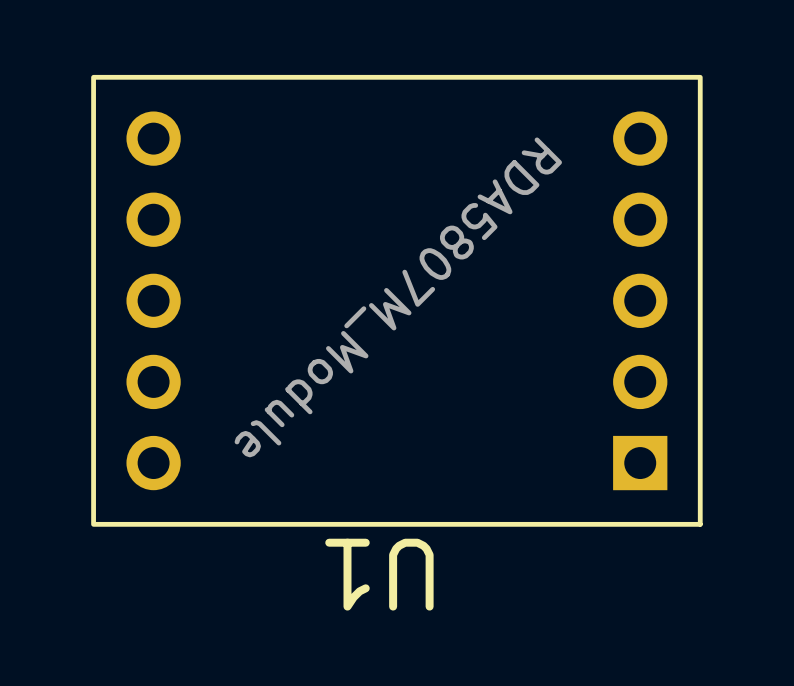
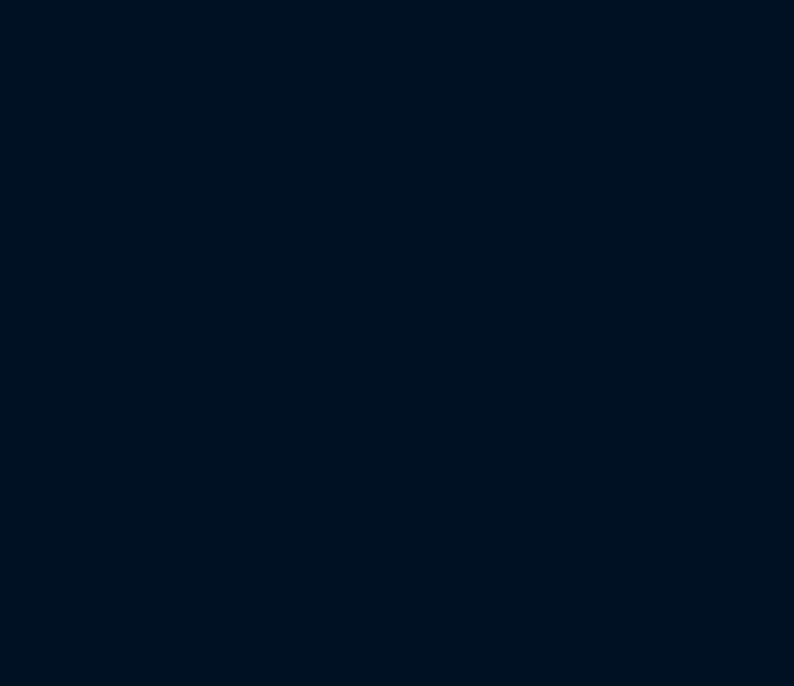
U1: RDA5807M_Module (396, 300) -> none

